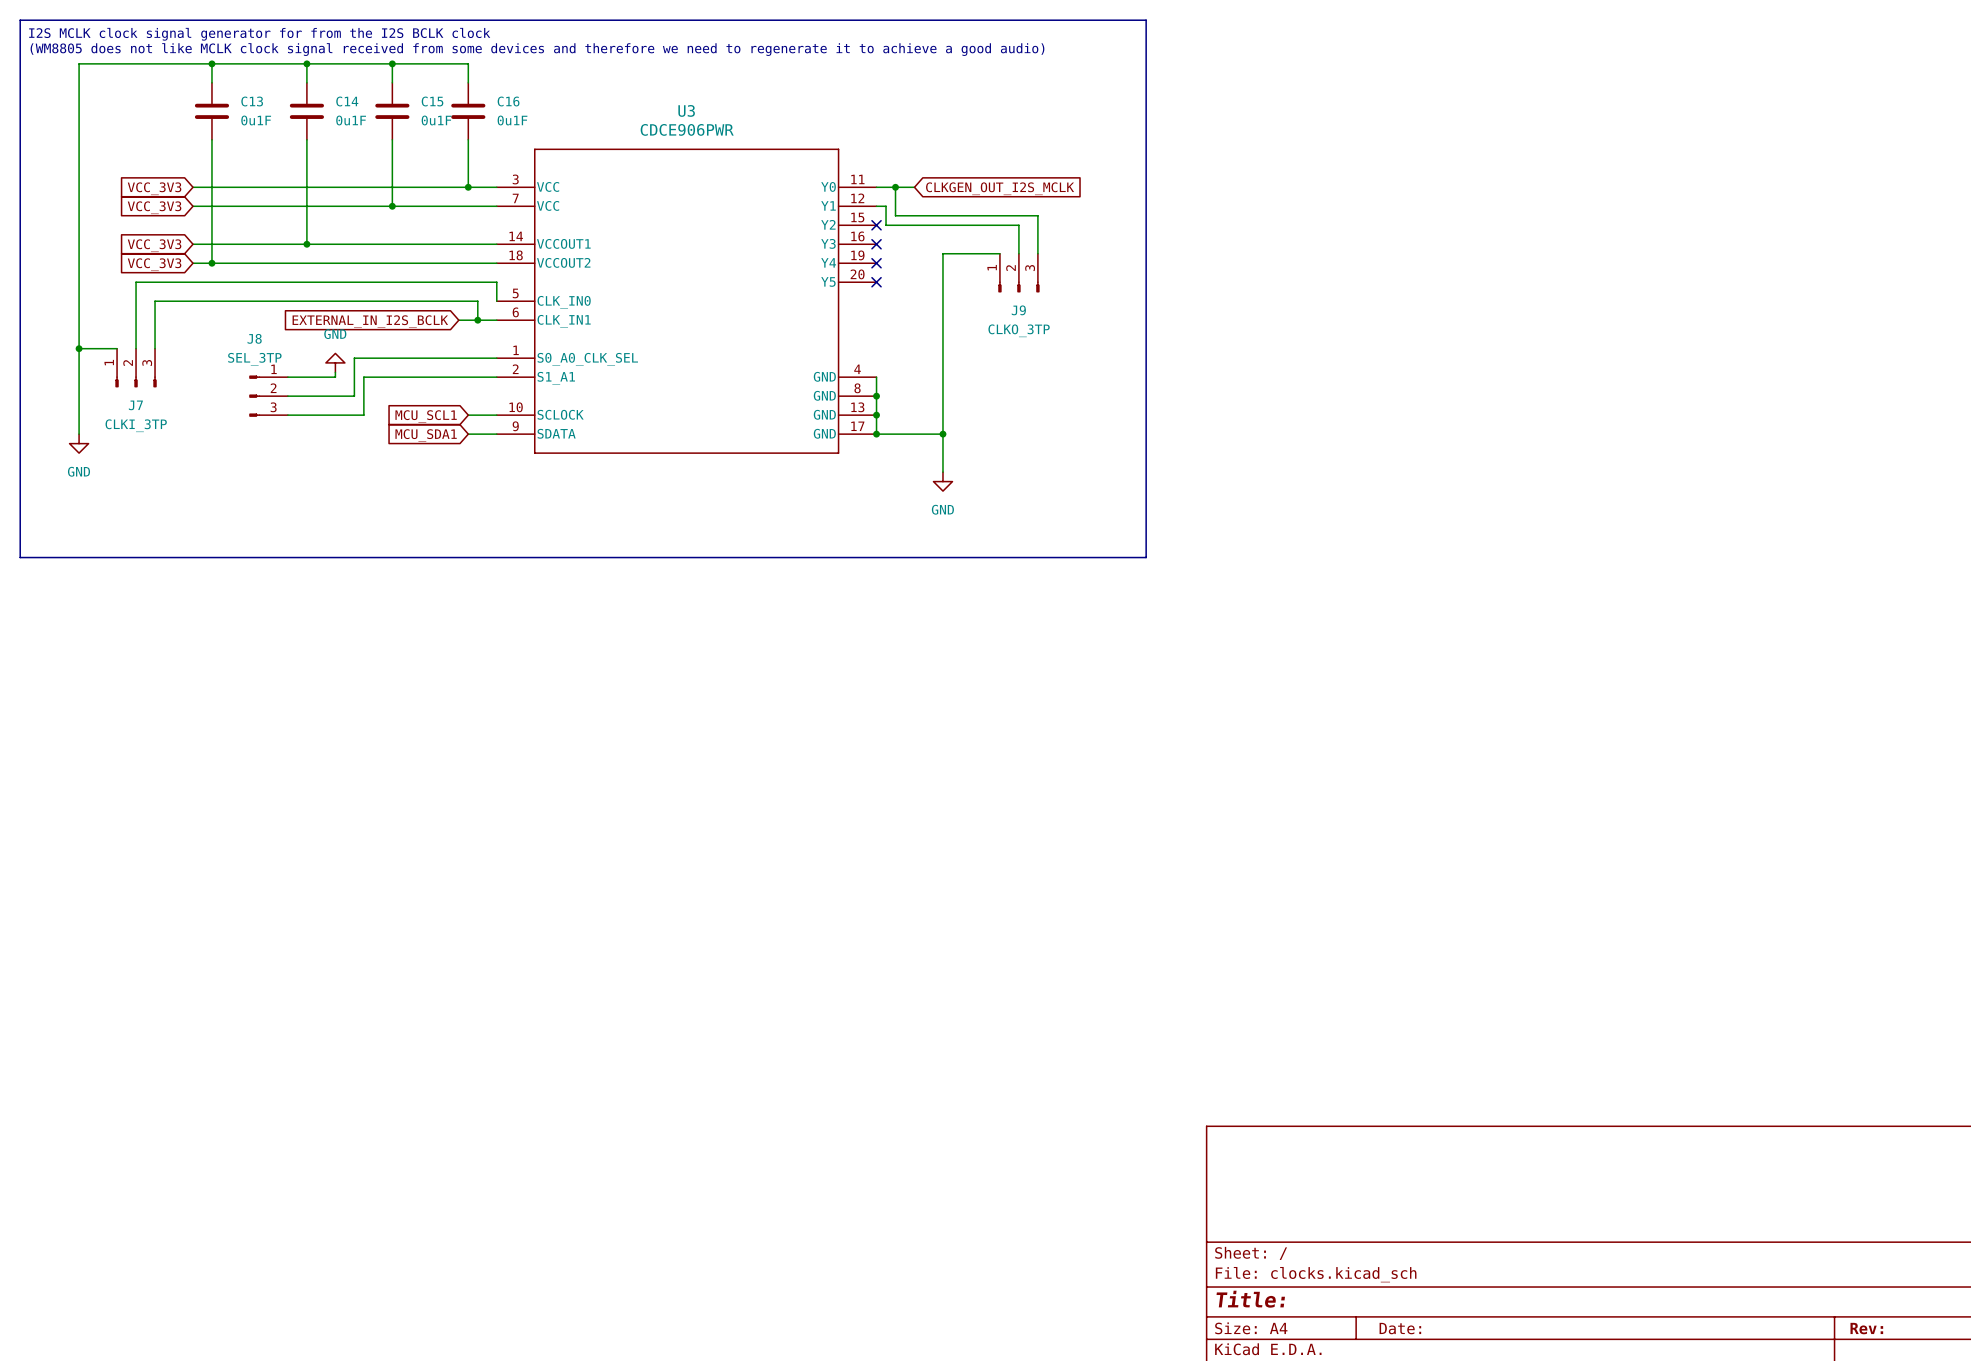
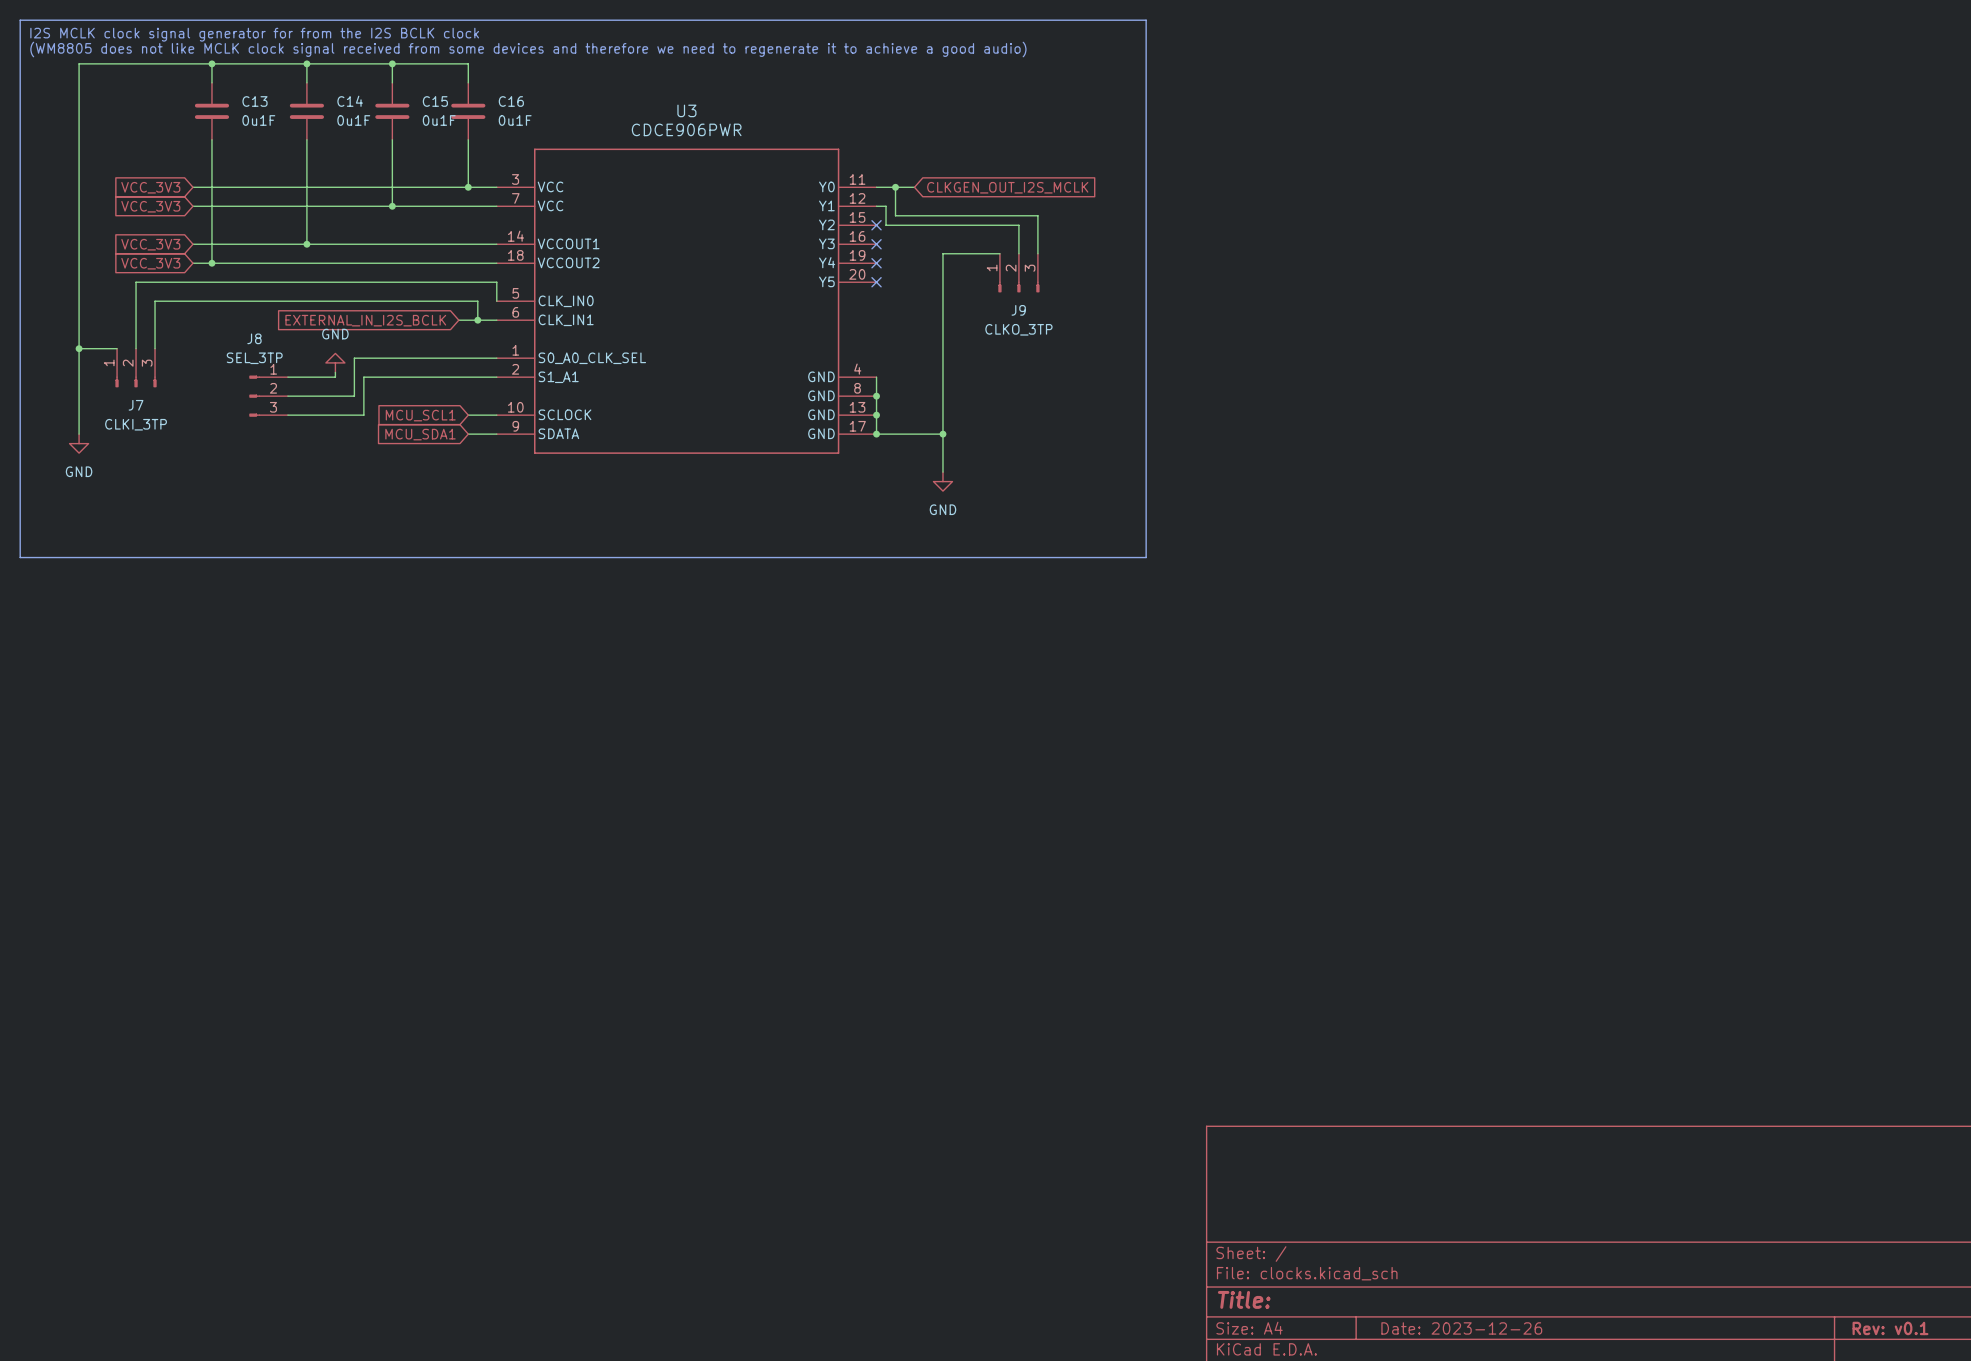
title block: Date: (1400, 1328) -> Date: 2023-12-26 (1461, 1328)
title block: Rev: (1866, 1328) -> Rev: v0.1 (1890, 1328)

